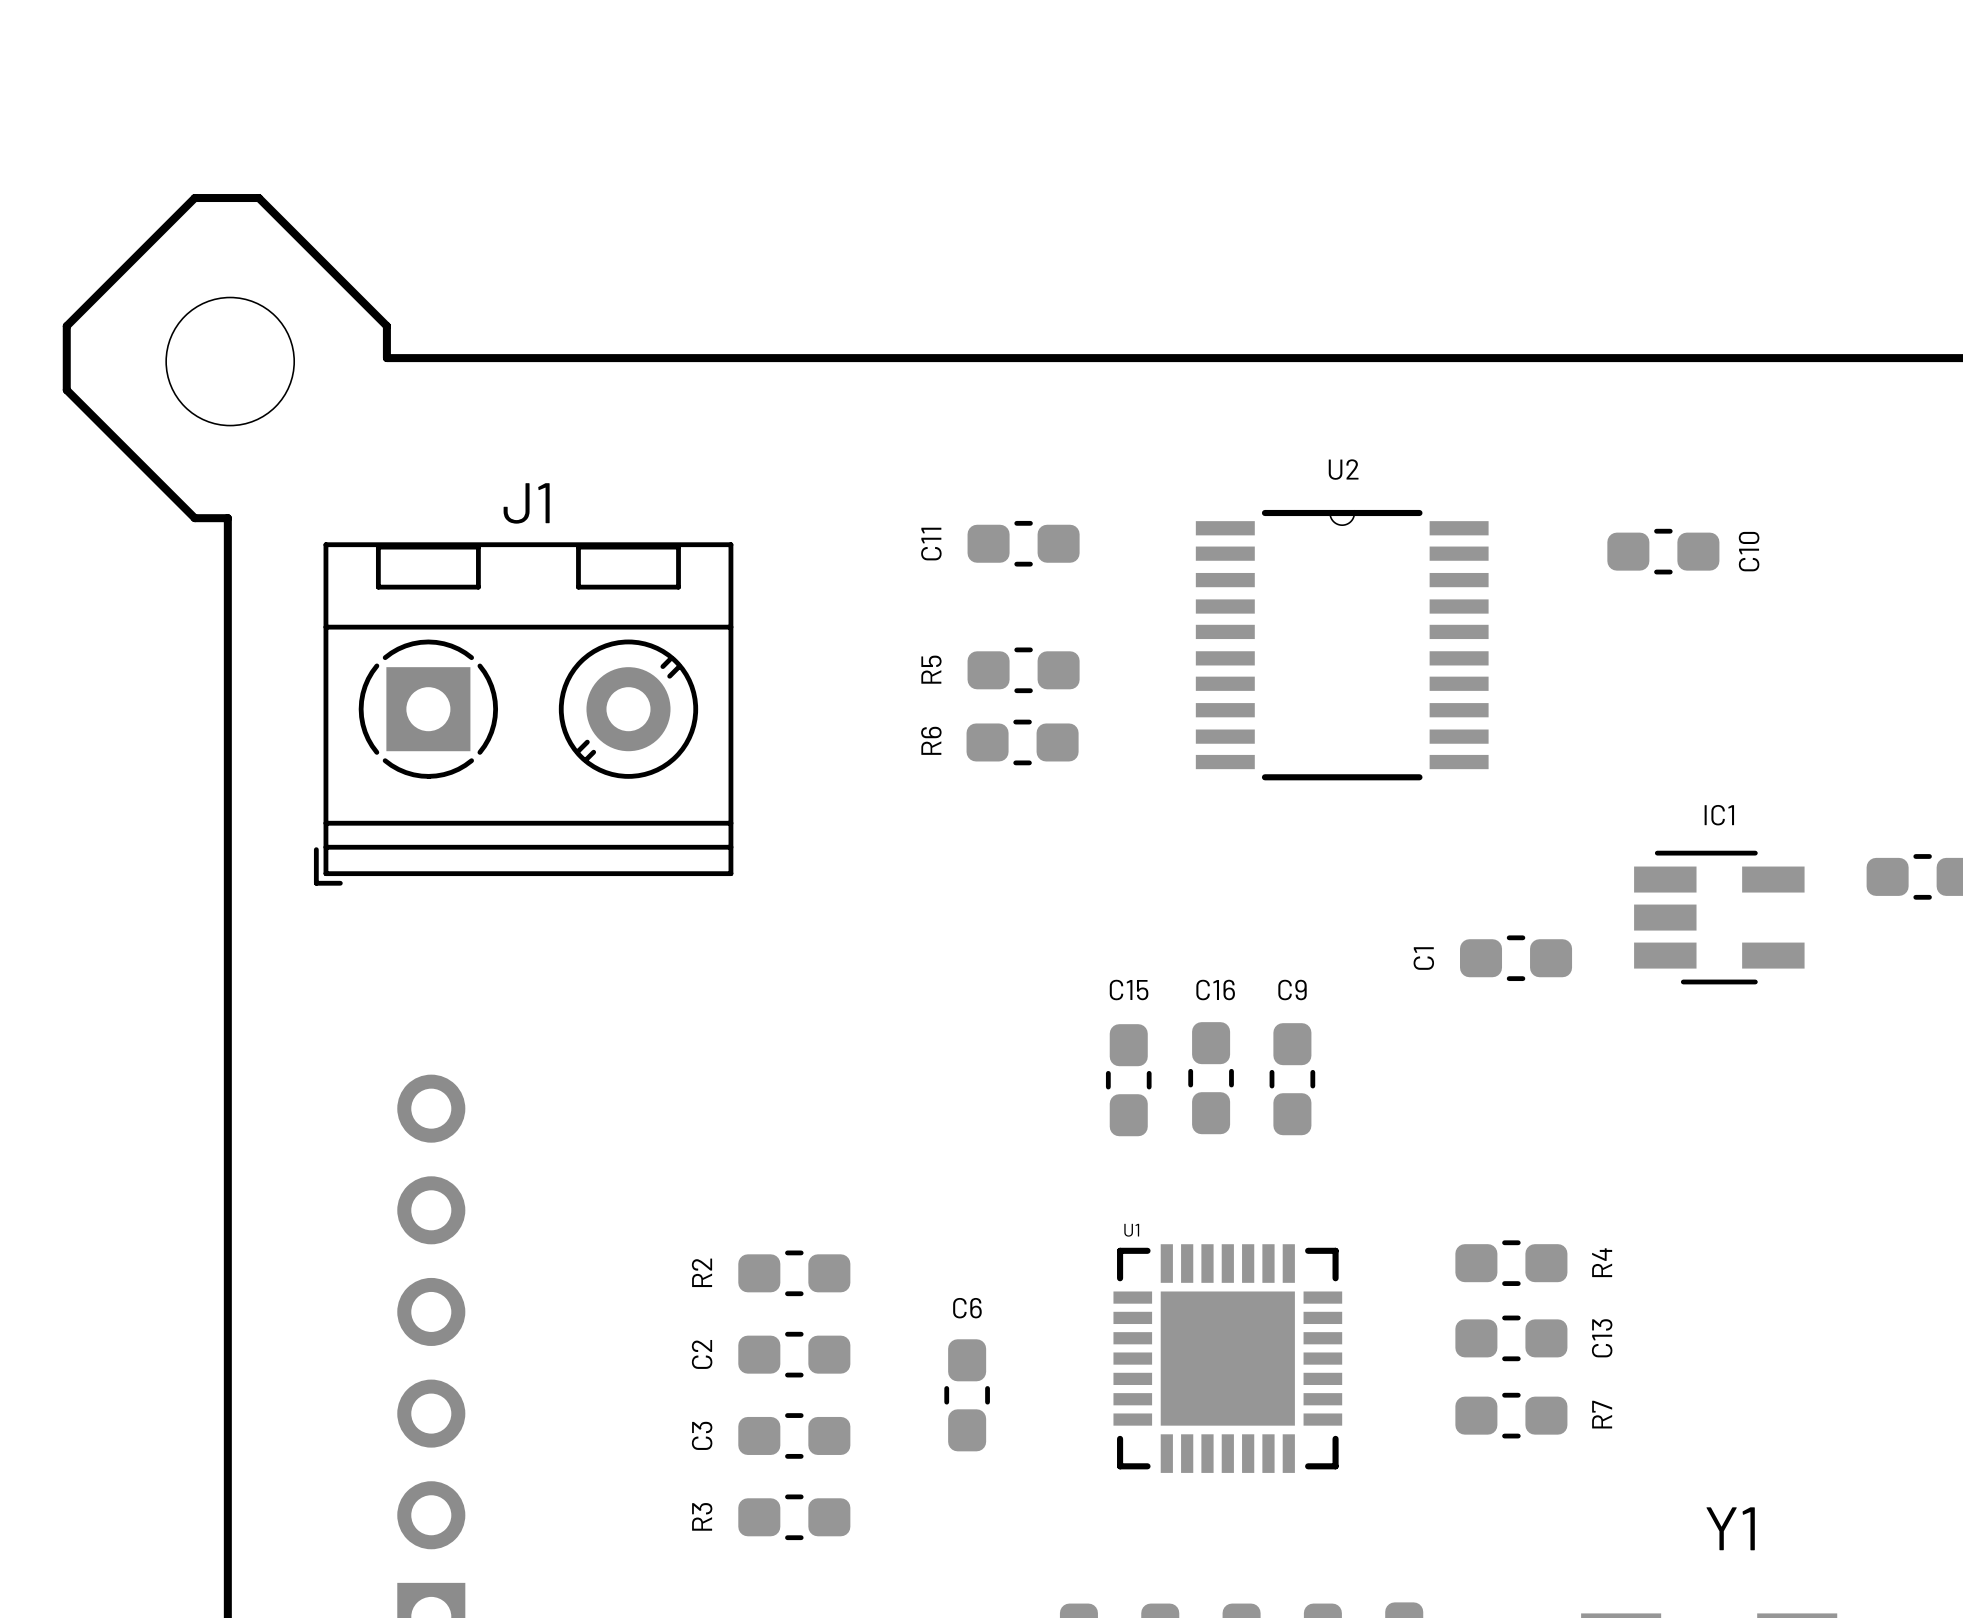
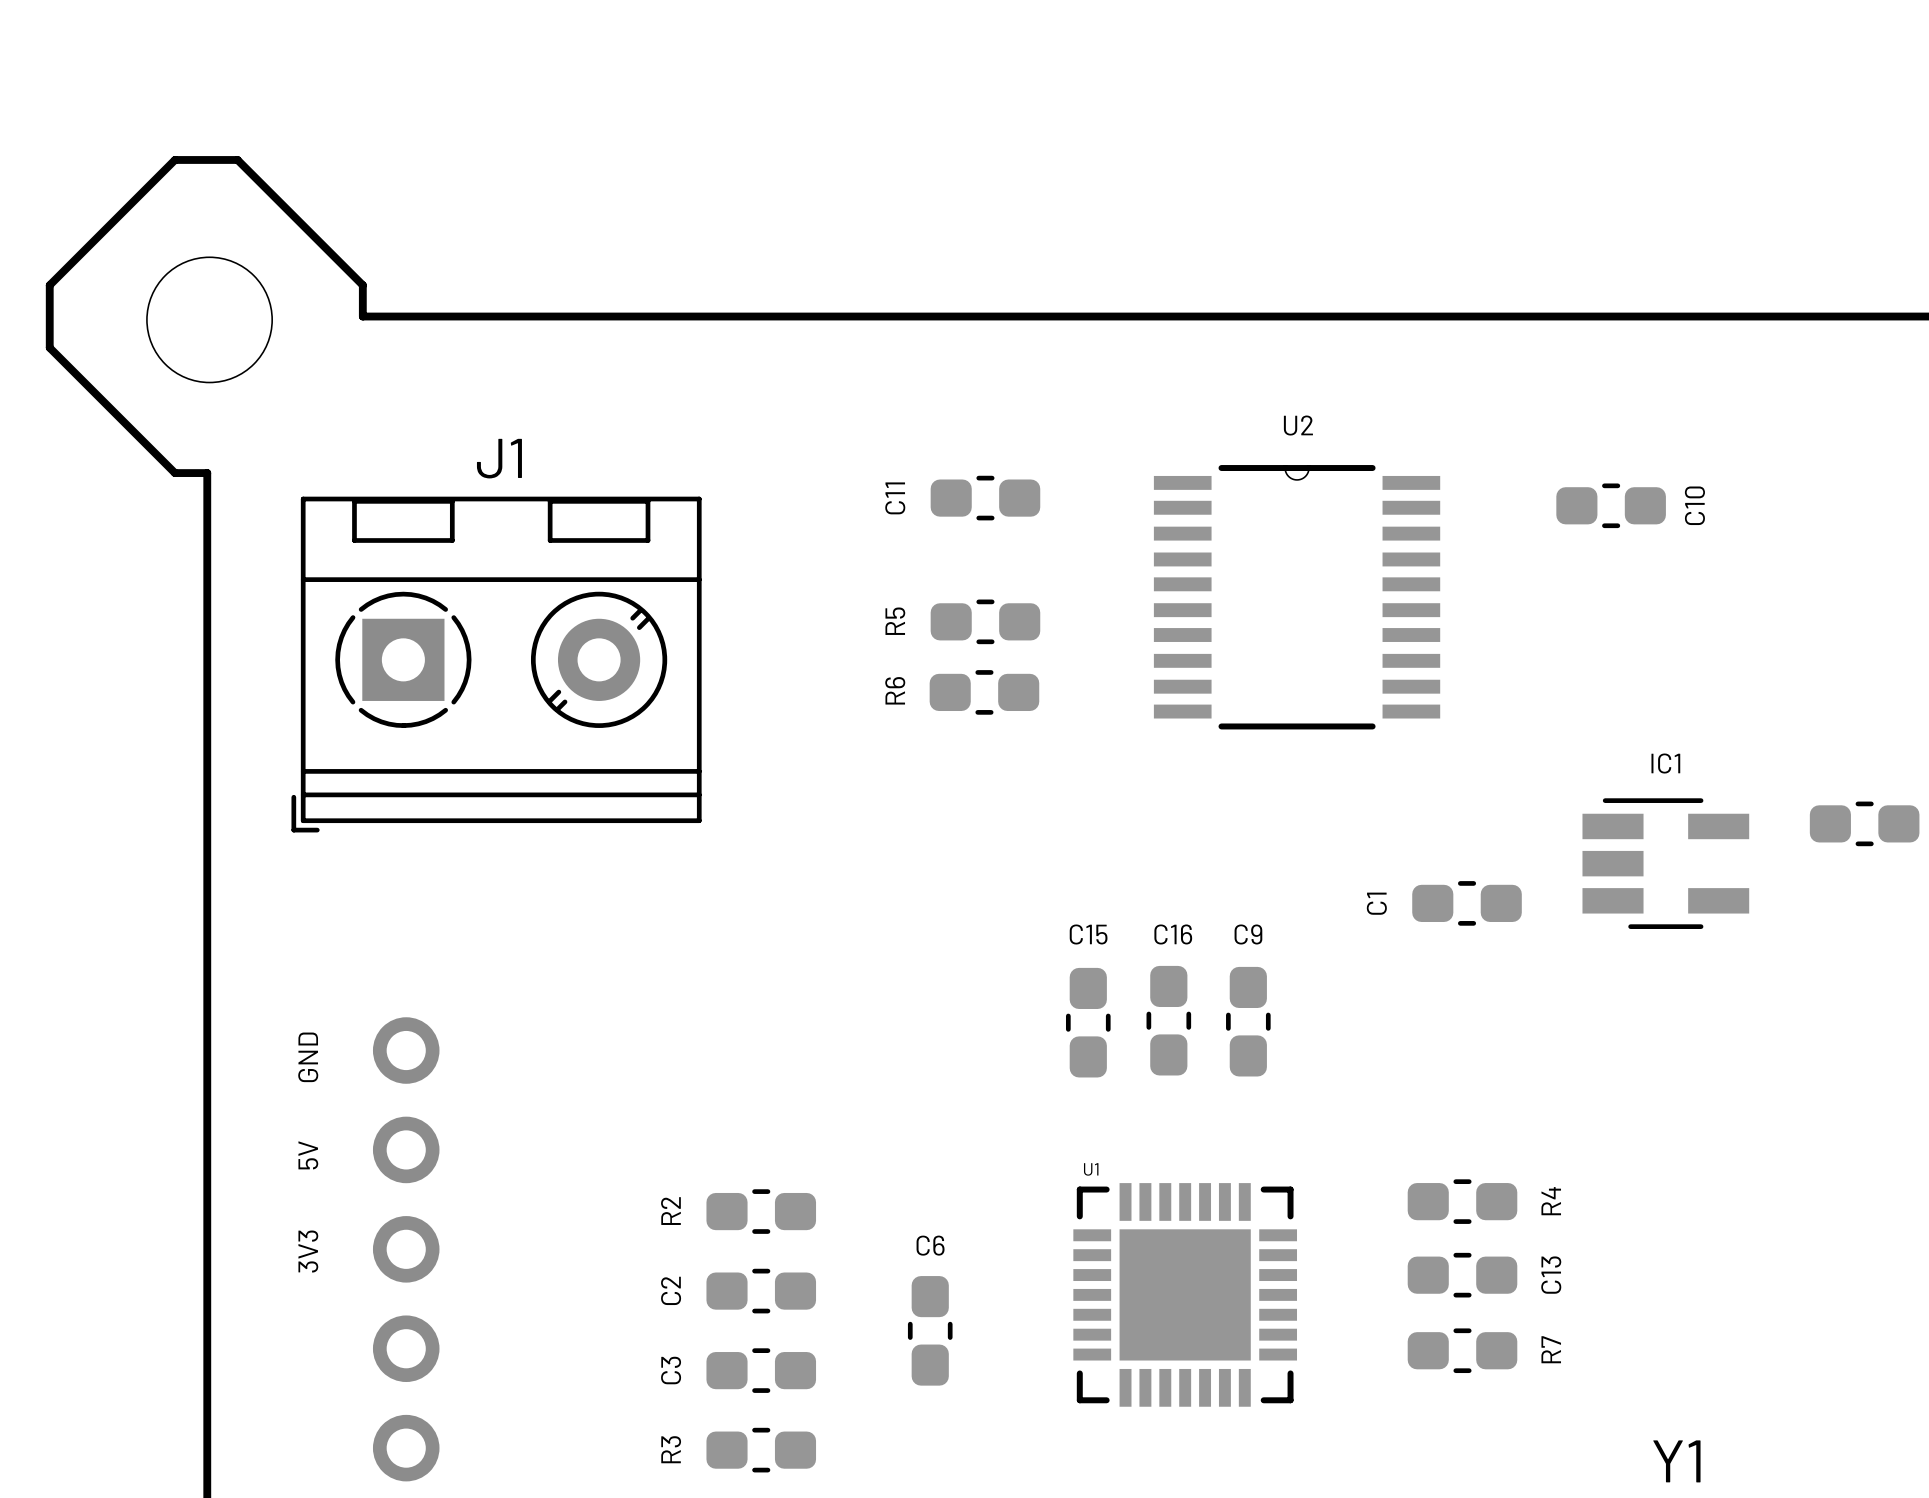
text: none -> GND (308, 1057)
text: none -> 5V (308, 1155)
text: none -> 3V3 (308, 1251)

